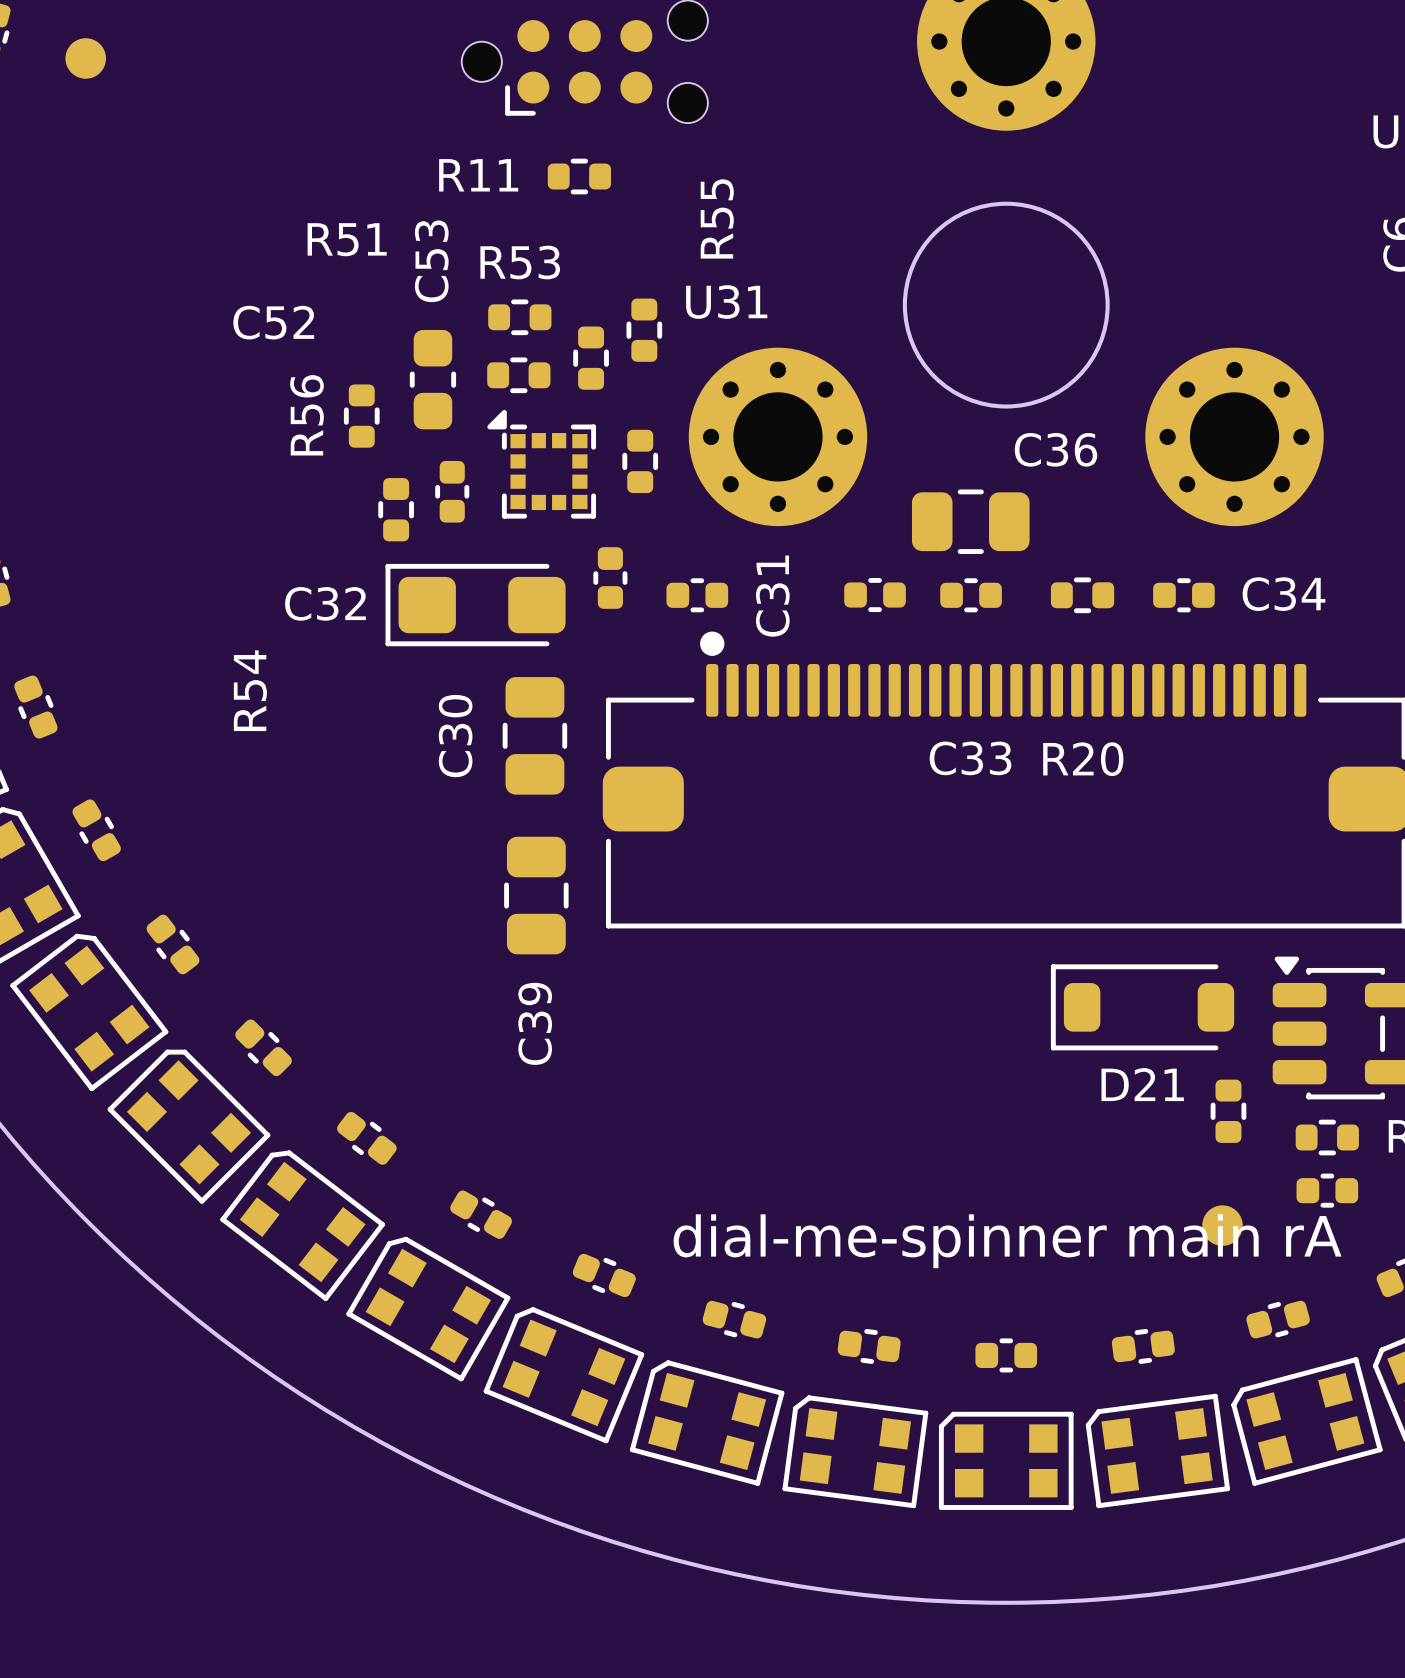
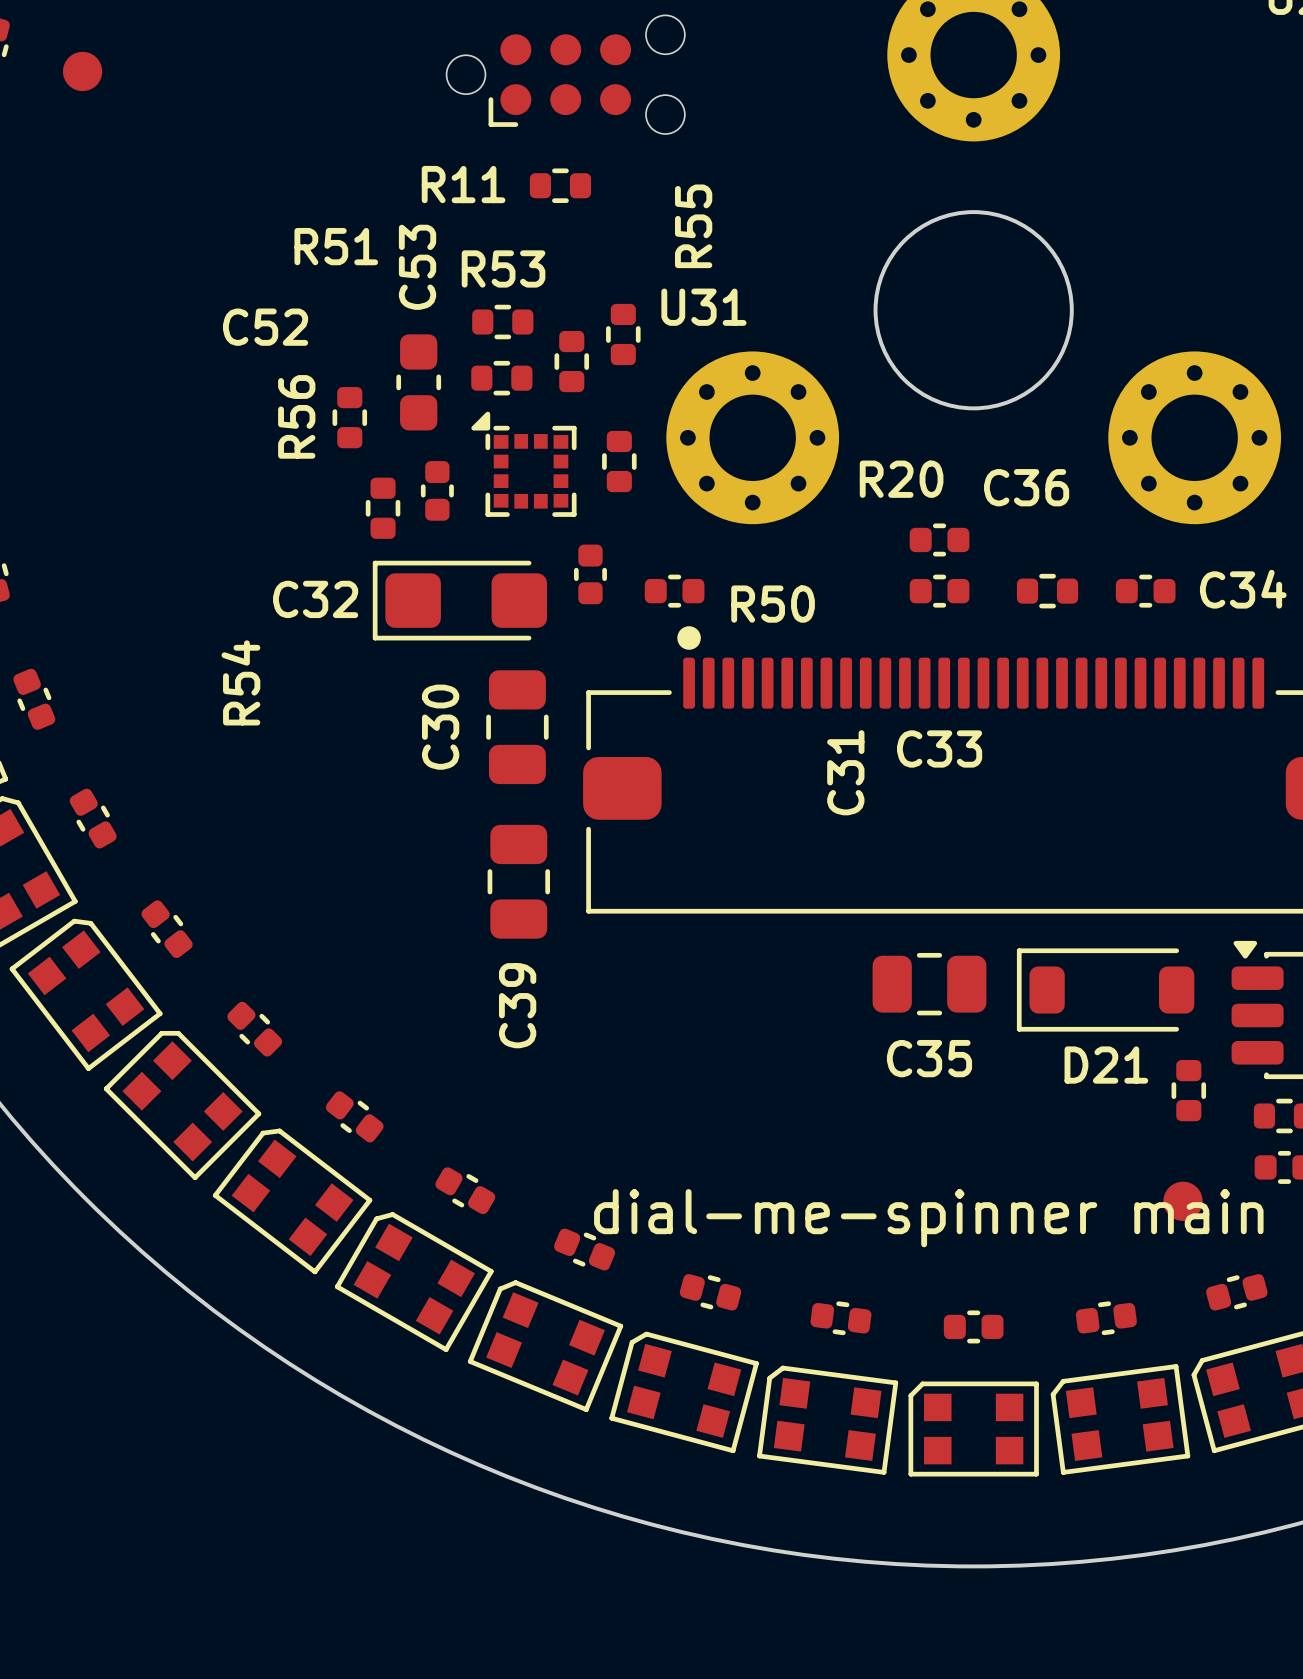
C36 name position: C36 (1056, 449) -> C36 (1026, 487)
part: (970, 521) -> none
C36 position: (875, 595) -> (939, 539)
C31 name position: C31 (772, 596) -> C31 (845, 772)
R50 name: none -> R50 (773, 604)
R20 name position: R20 (1083, 759) -> R20 (901, 479)
C35: none -> (929, 984)

